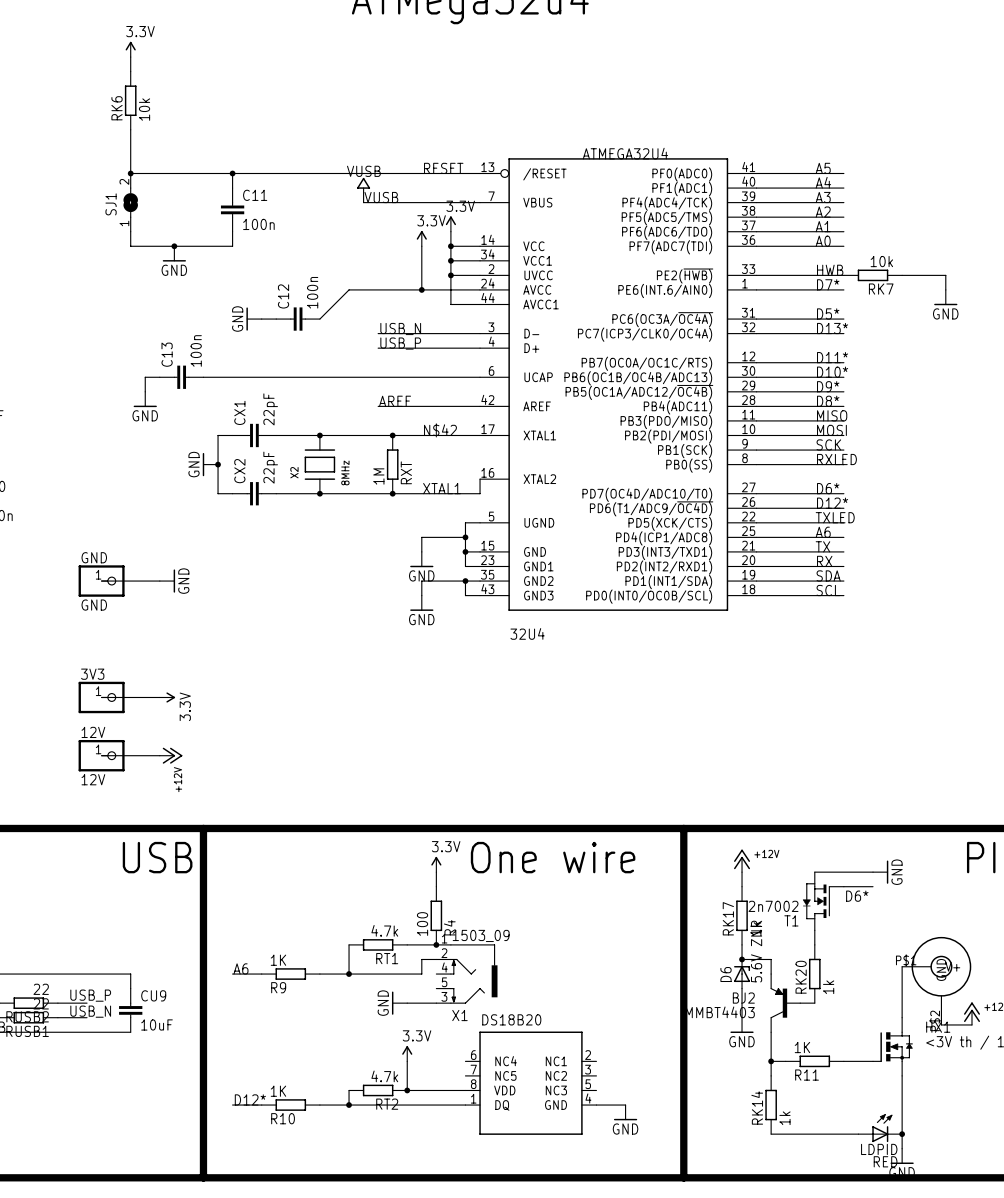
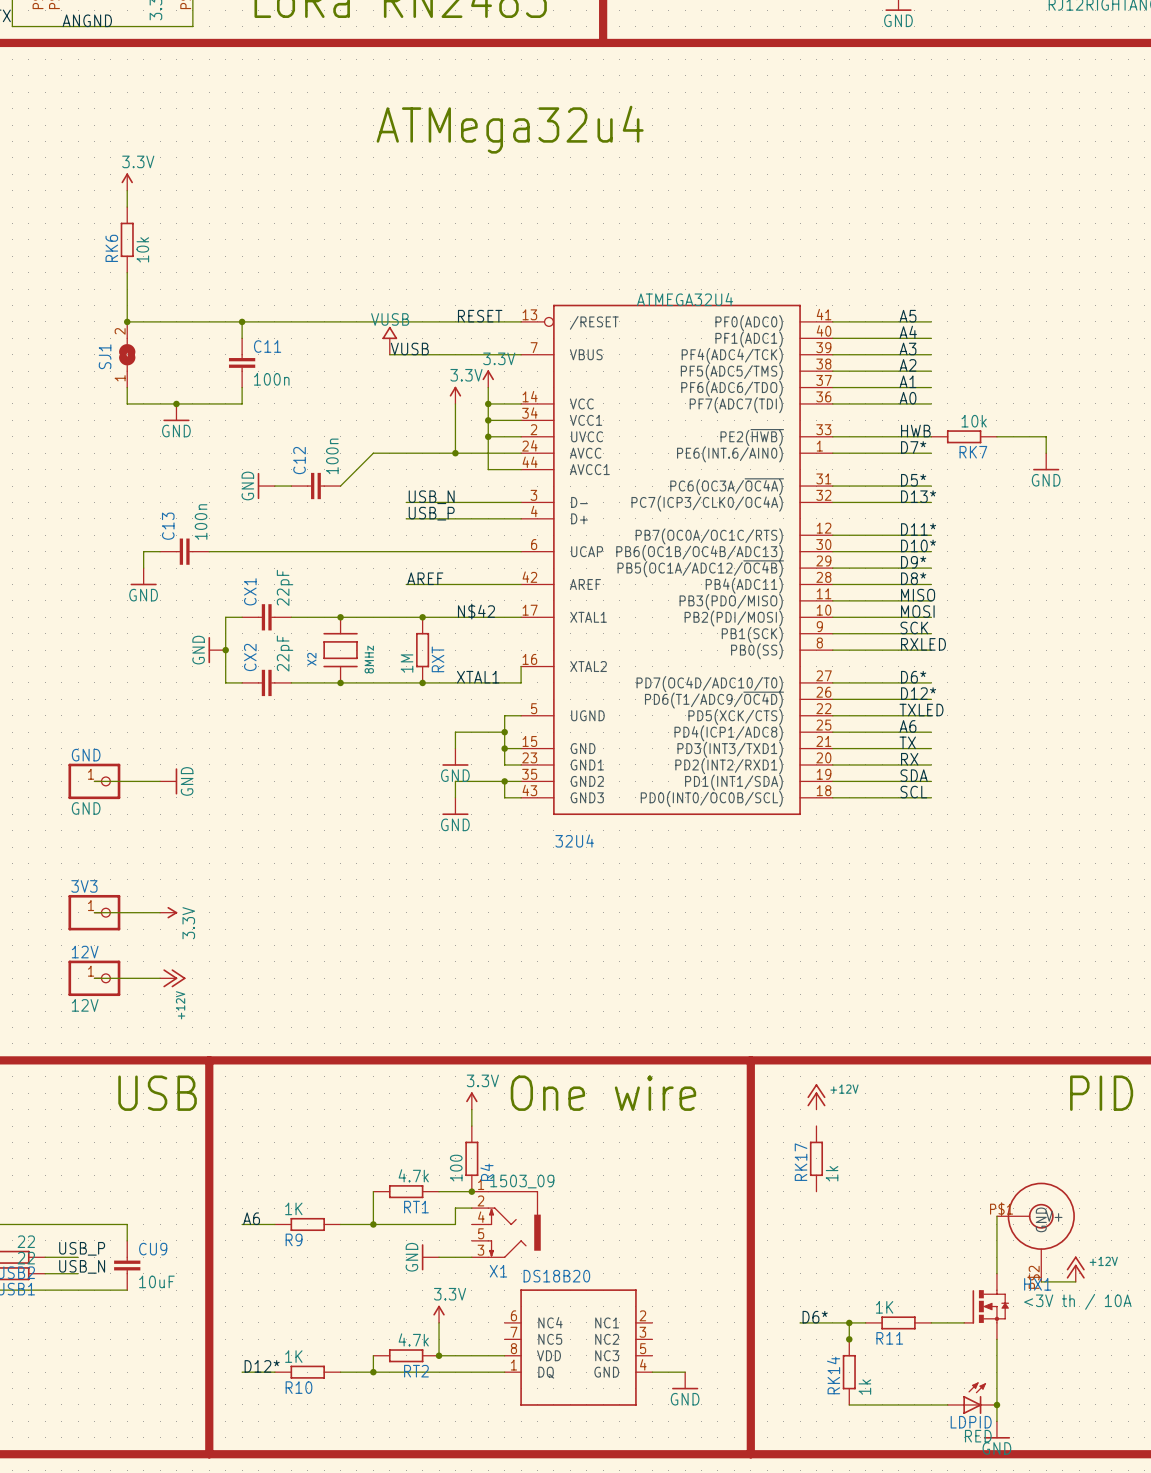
wire: (742, 872) (742, 886) -> none
wire: (814, 872) (873, 872) -> none
power symbol: GND (880, 872) -> none
wire: (843, 886) (873, 886) -> none
label: D6* (857, 896) -> none
T1: 2n7002 (823, 901) -> none
wire: (814, 930) (814, 944) -> none
wire: (742, 944) (742, 959) (771, 959) (771, 974) -> none
junction: (742, 959) -> none
D6: 5.6V ZNR (742, 974) -> none
RK20: 1k (814, 974) -> none
wire: (742, 988) (742, 1017) -> none
BJ2: MMBT4403 (785, 1003) -> none
wire: (800, 1003) (814, 1003) -> none
power symbol: GND (742, 1025) -> none
wire: (771, 1032) (771, 1061) -> (800, 1322) (849, 1322)
label: none -> D6* (815, 1317)
junction: none -> (849, 1339)

